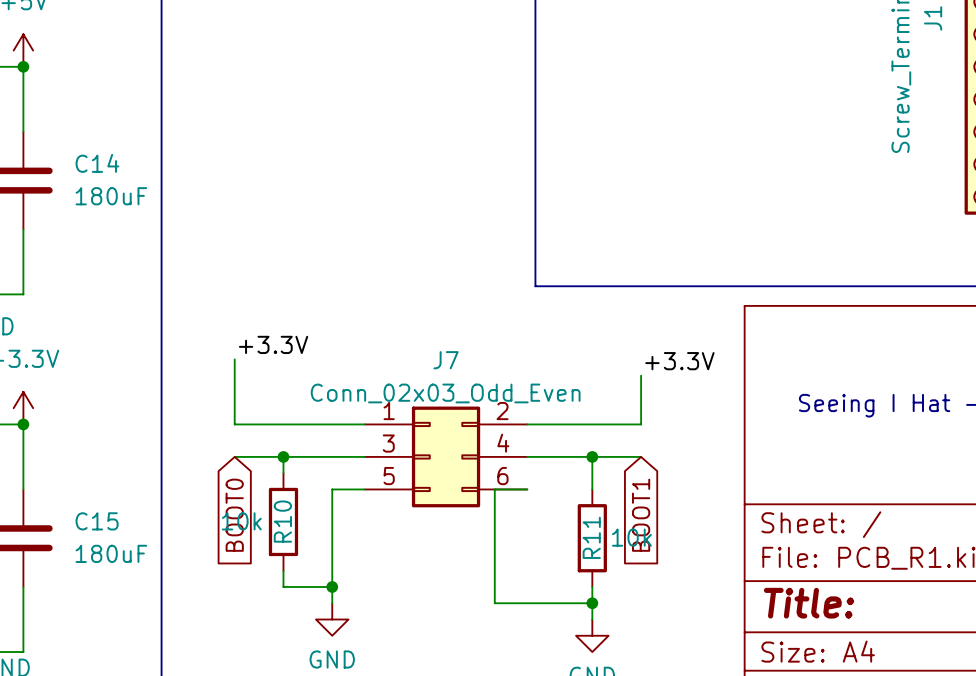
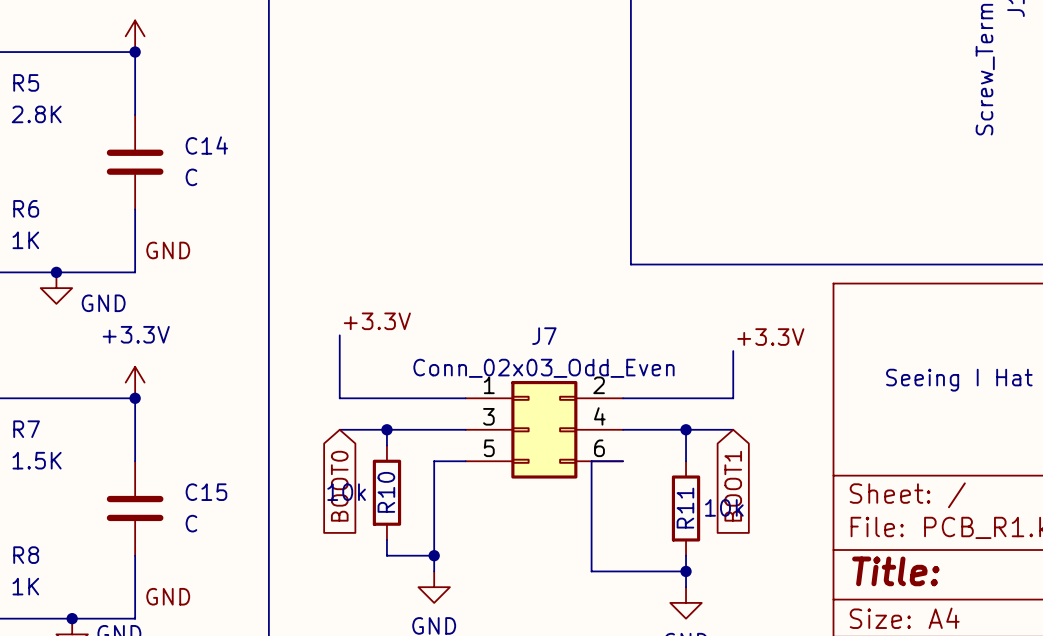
C14 value: 180uF (111, 196) -> C (191, 177)
label: none -> GND (168, 250)
C15 value: 180uF (111, 553) -> C (191, 523)
label: none -> GND (168, 596)

